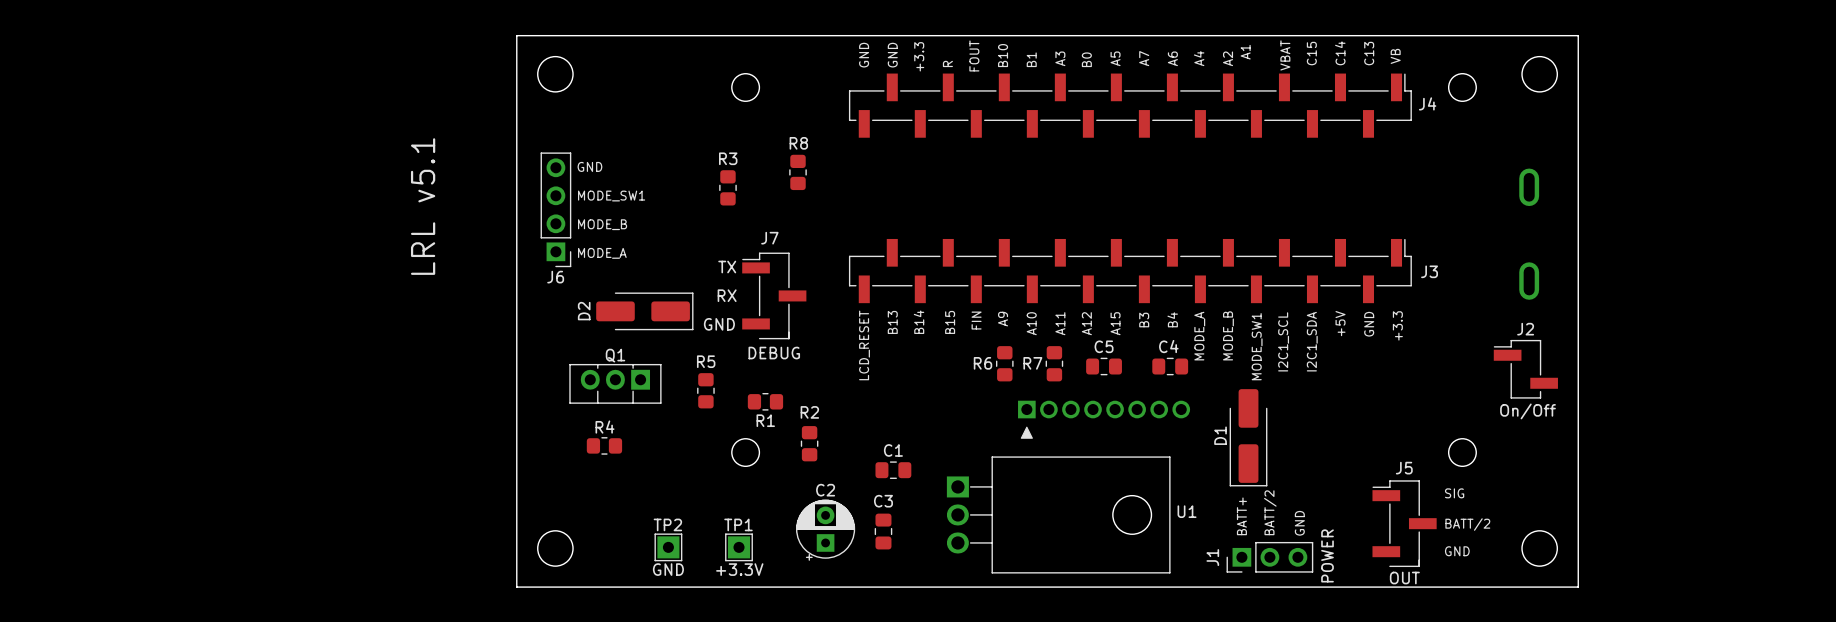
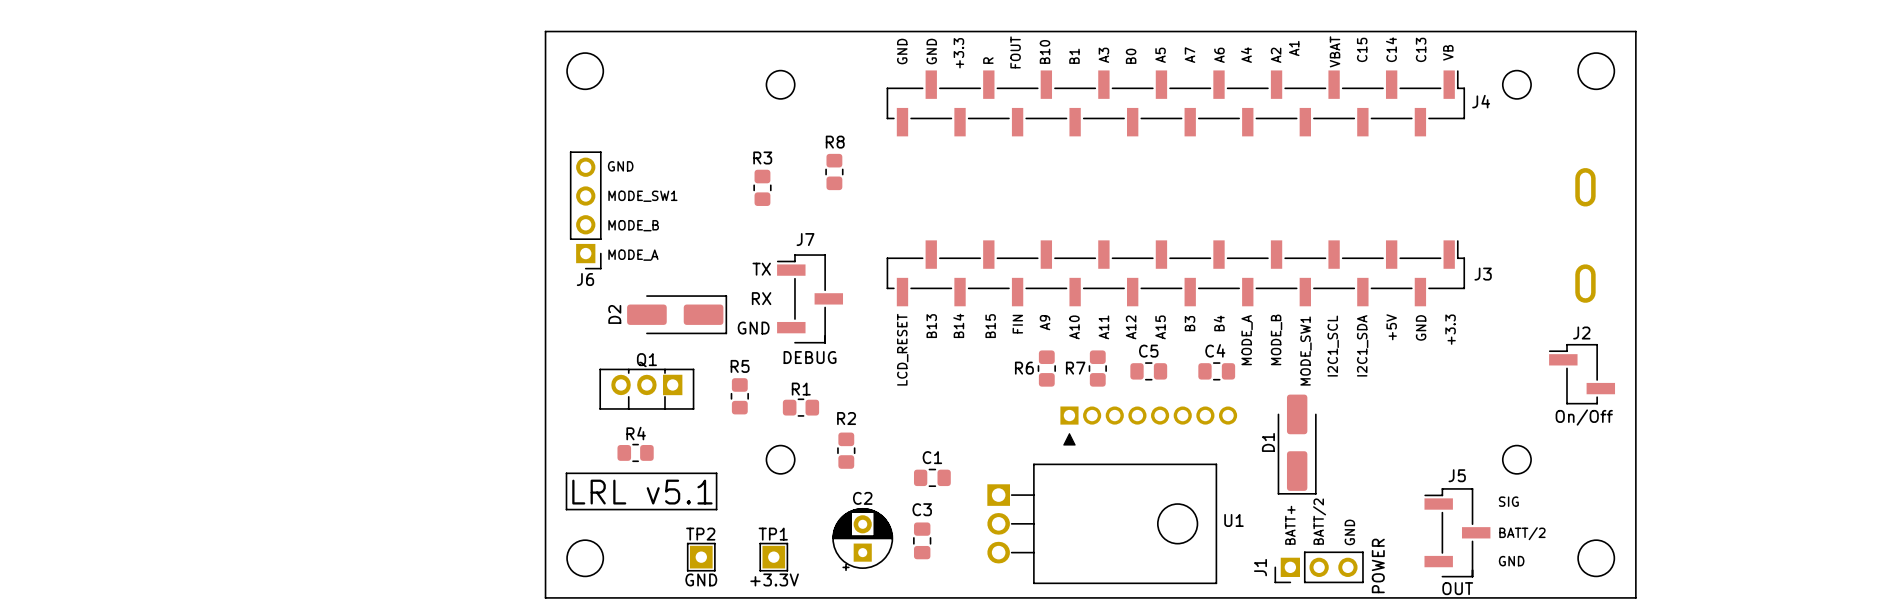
text rotation: 0° (423, 206) -> 90° clockwise (642, 492)
text position: LRL v5.1 (423, 206) -> LRL v5.1 (642, 492)
R1 name position: R1 (765, 420) -> R1 (801, 389)
line: none -> (566, 473) (716, 473) (716, 509) (566, 509) (566, 473)

